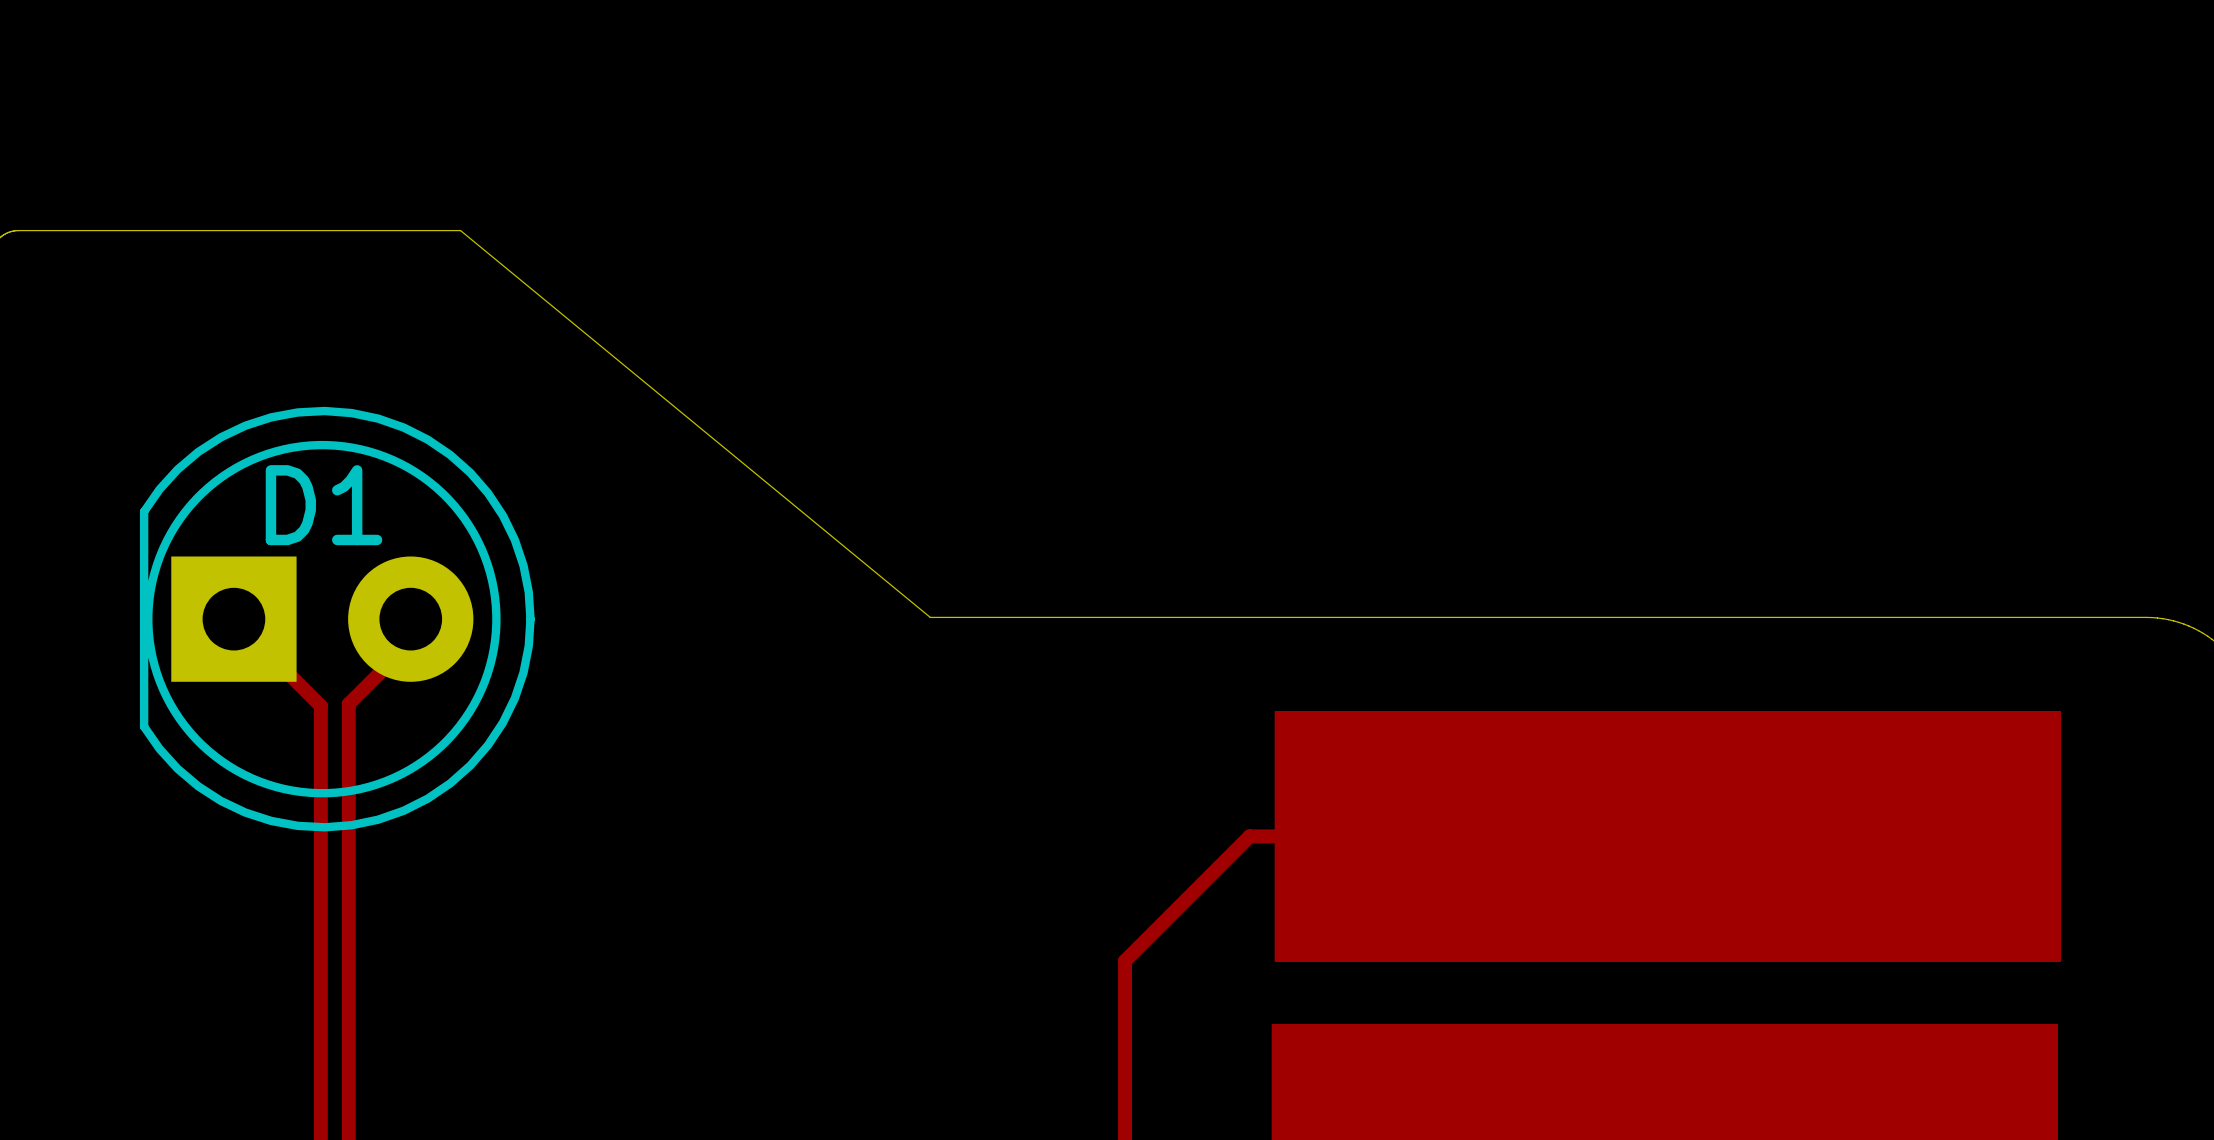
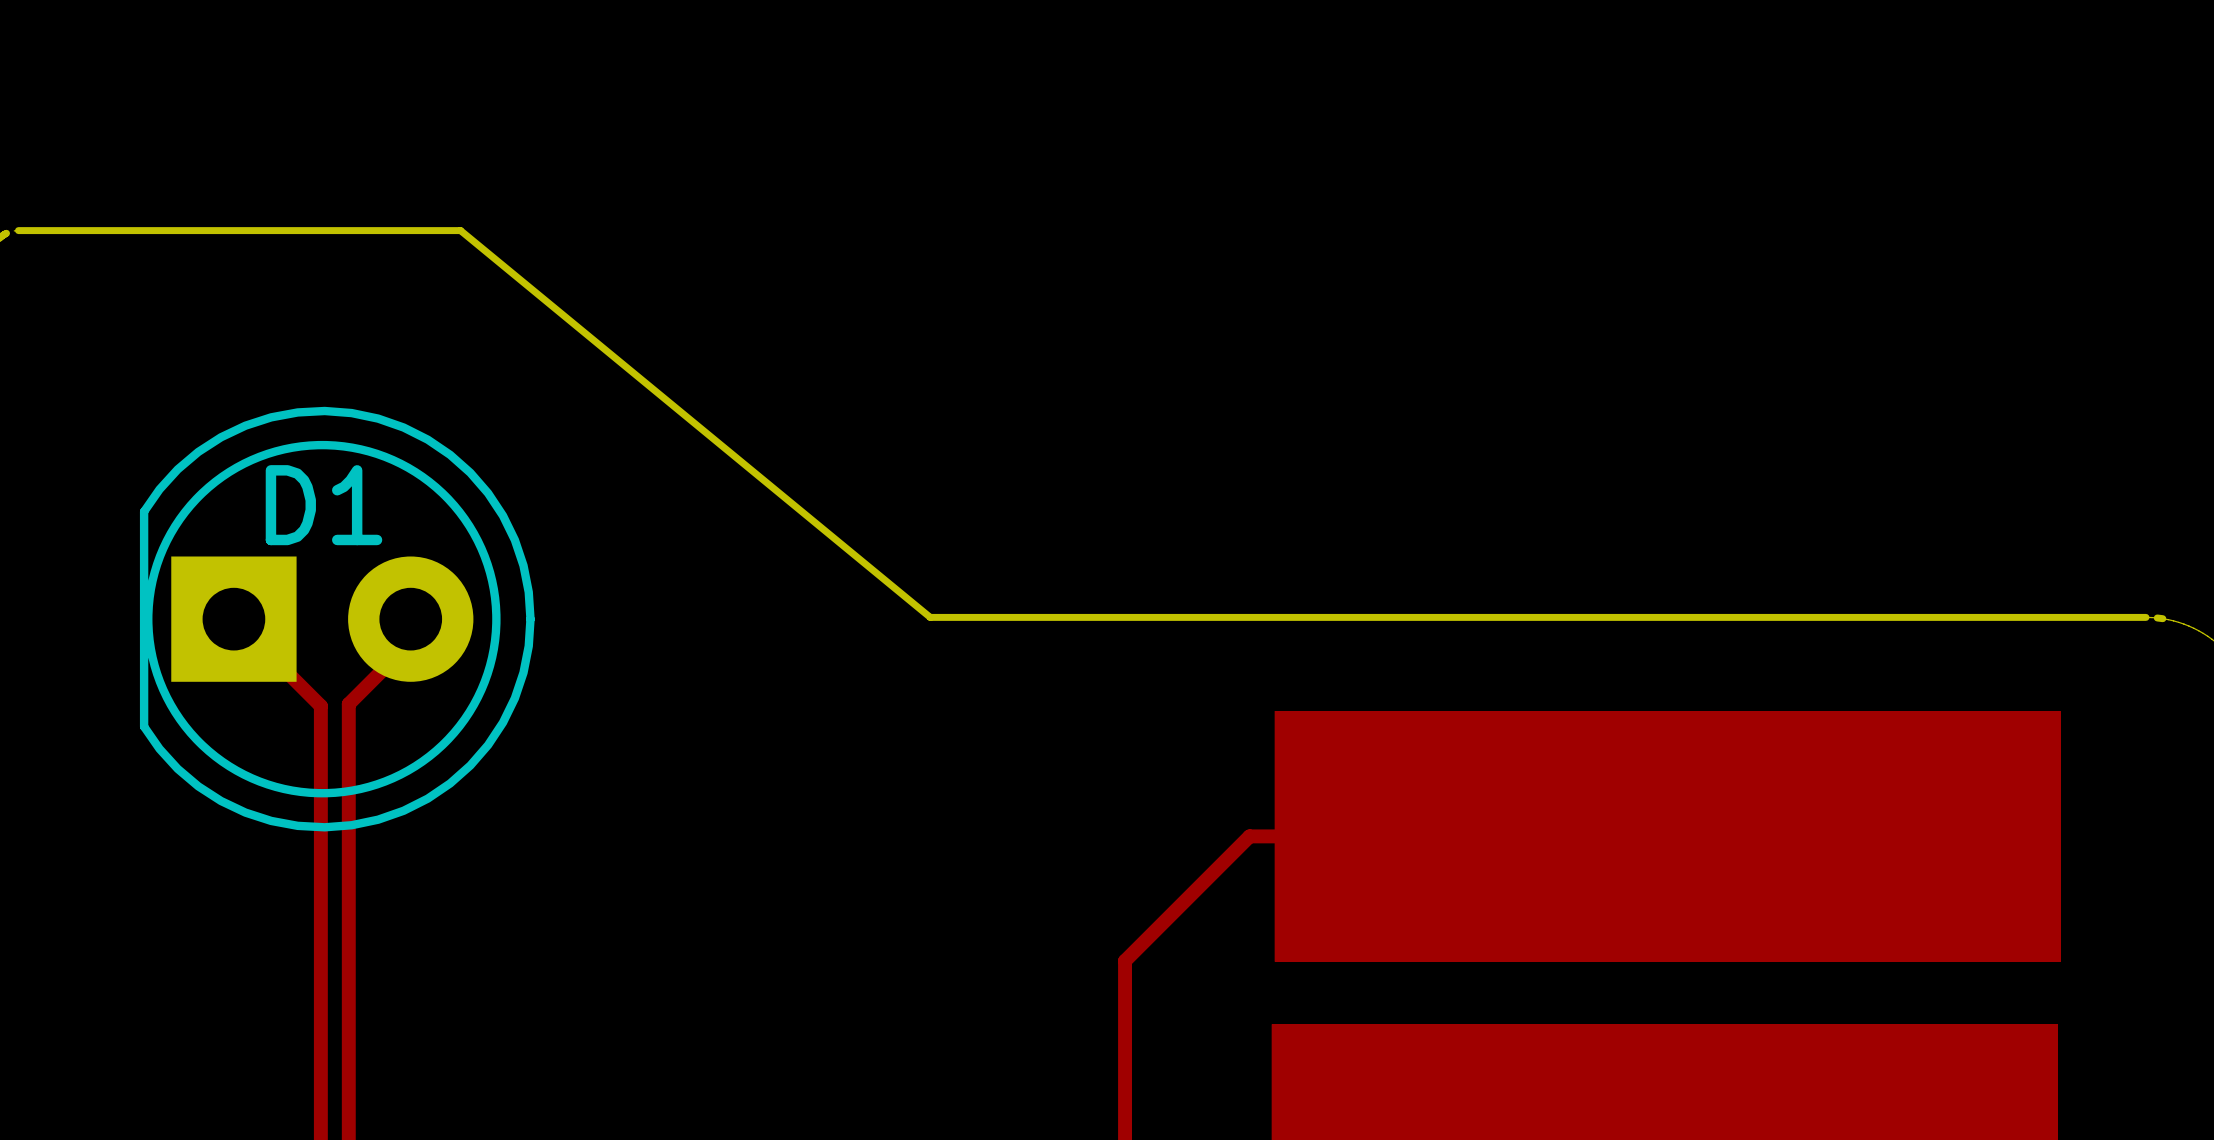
board edge width: thin (18, 230) (460, 230) (930, 617) (2146, 617) -> thick (18, 230) (460, 230) (930, 617) (2146, 617)
board edge width: thin (2157, 617) (2162, 618) -> thick (2157, 617) (2162, 618)

